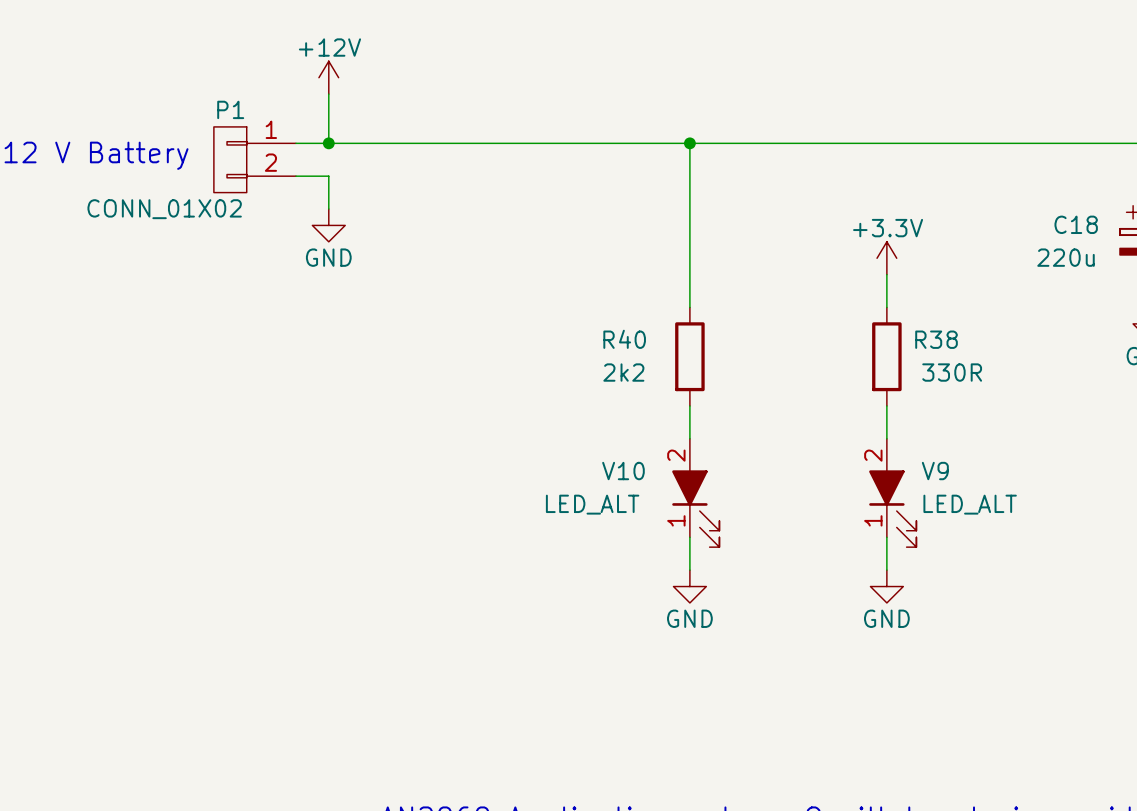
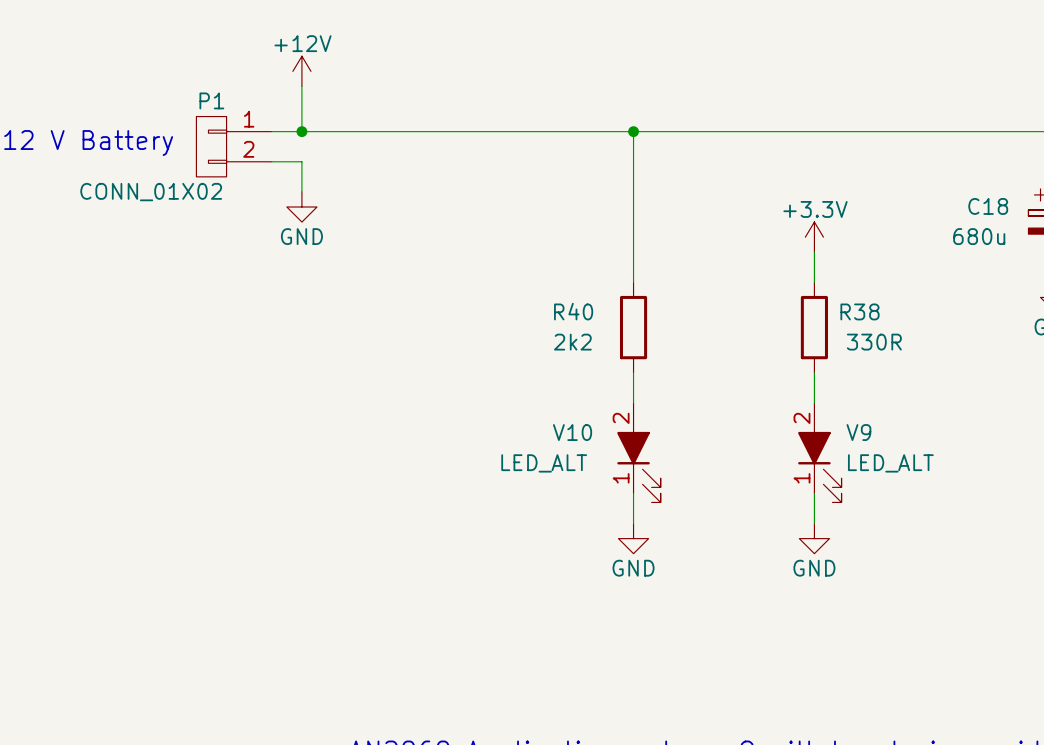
C18 value: 220u (1066, 257) -> 680u (979, 236)

